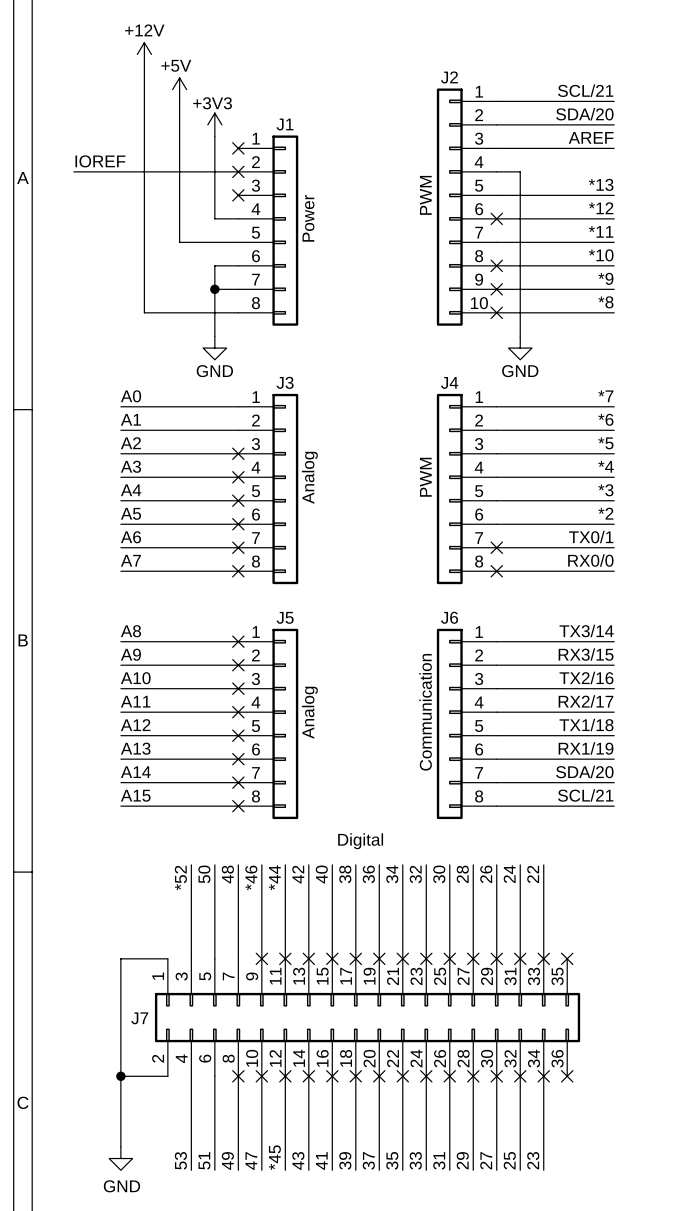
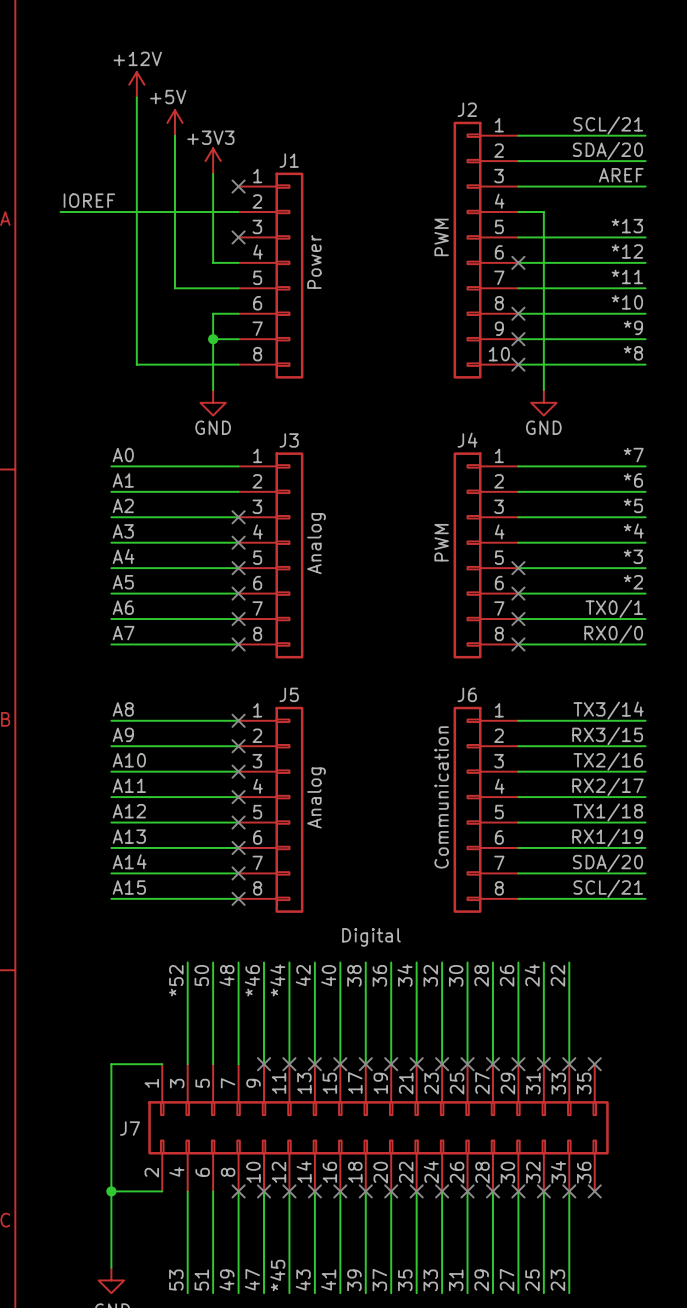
no-connect mark: (238, 171) -> none
no-connect mark: none -> (518, 568)
no-connect mark: none -> (518, 593)

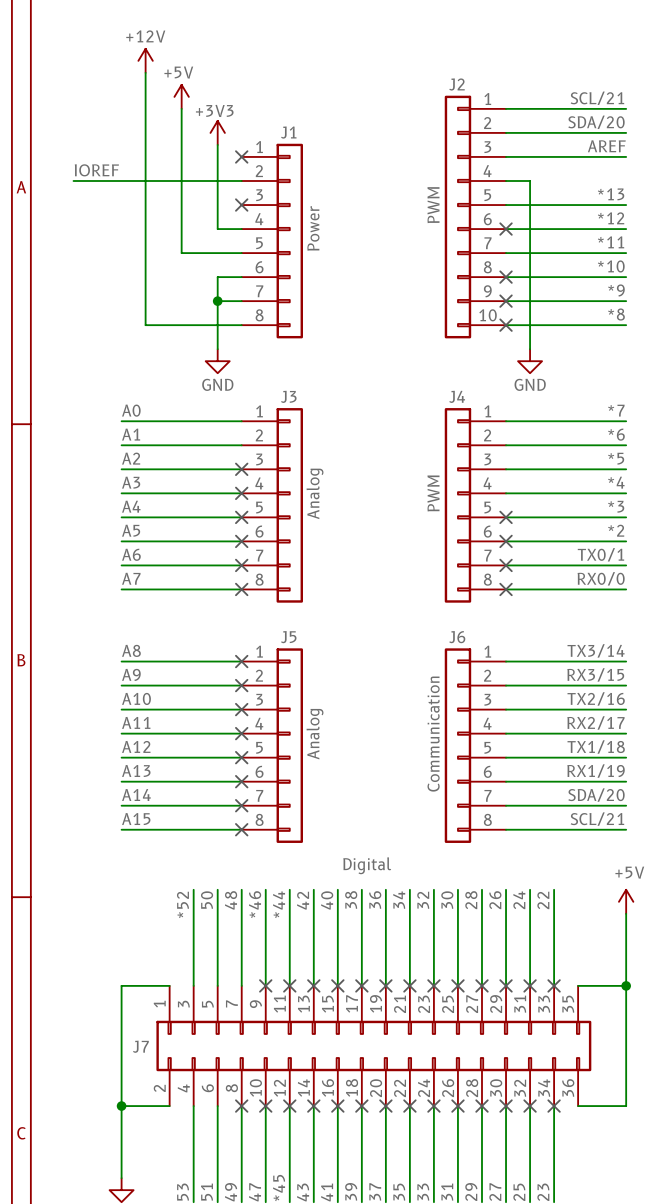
power symbol: none -> +5V (626, 901)
wire: none -> (626, 913) (626, 1106) (578, 1106)
wire: none -> (578, 985) (626, 985)
no-connect mark: (594, 1064) -> none
junction: none -> (626, 985)
no-connect mark: (594, 1191) -> none

